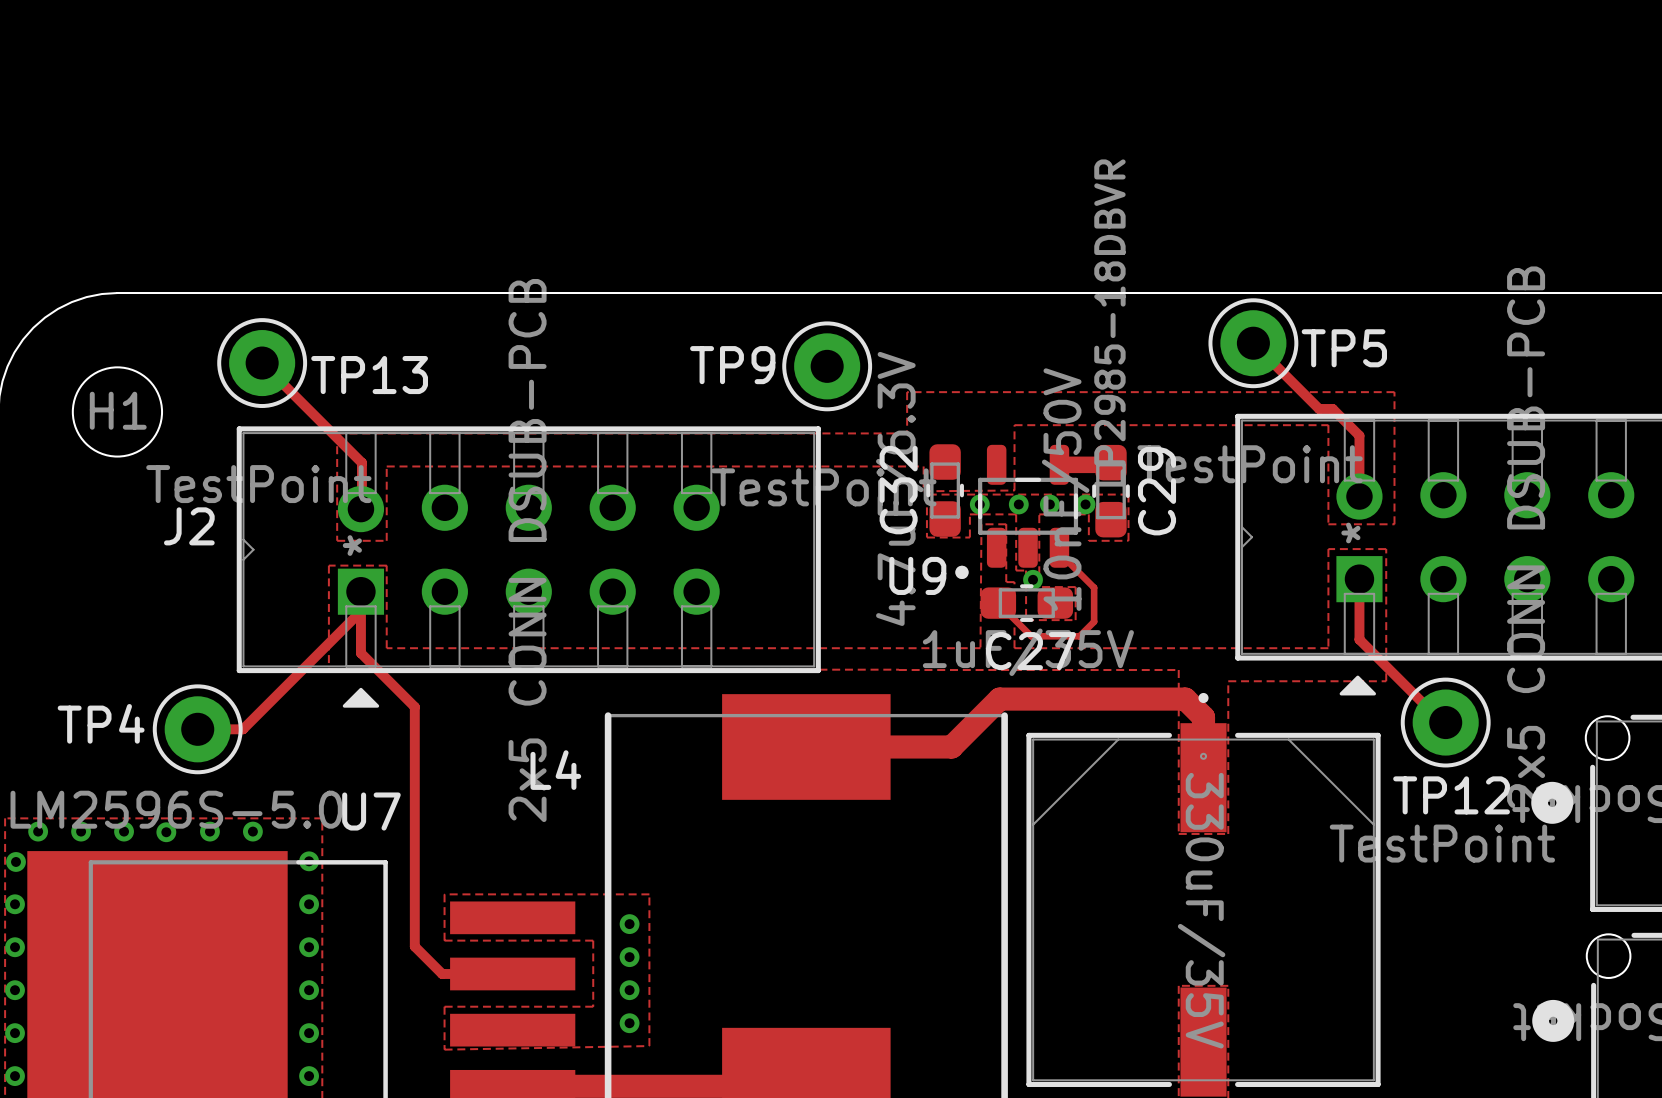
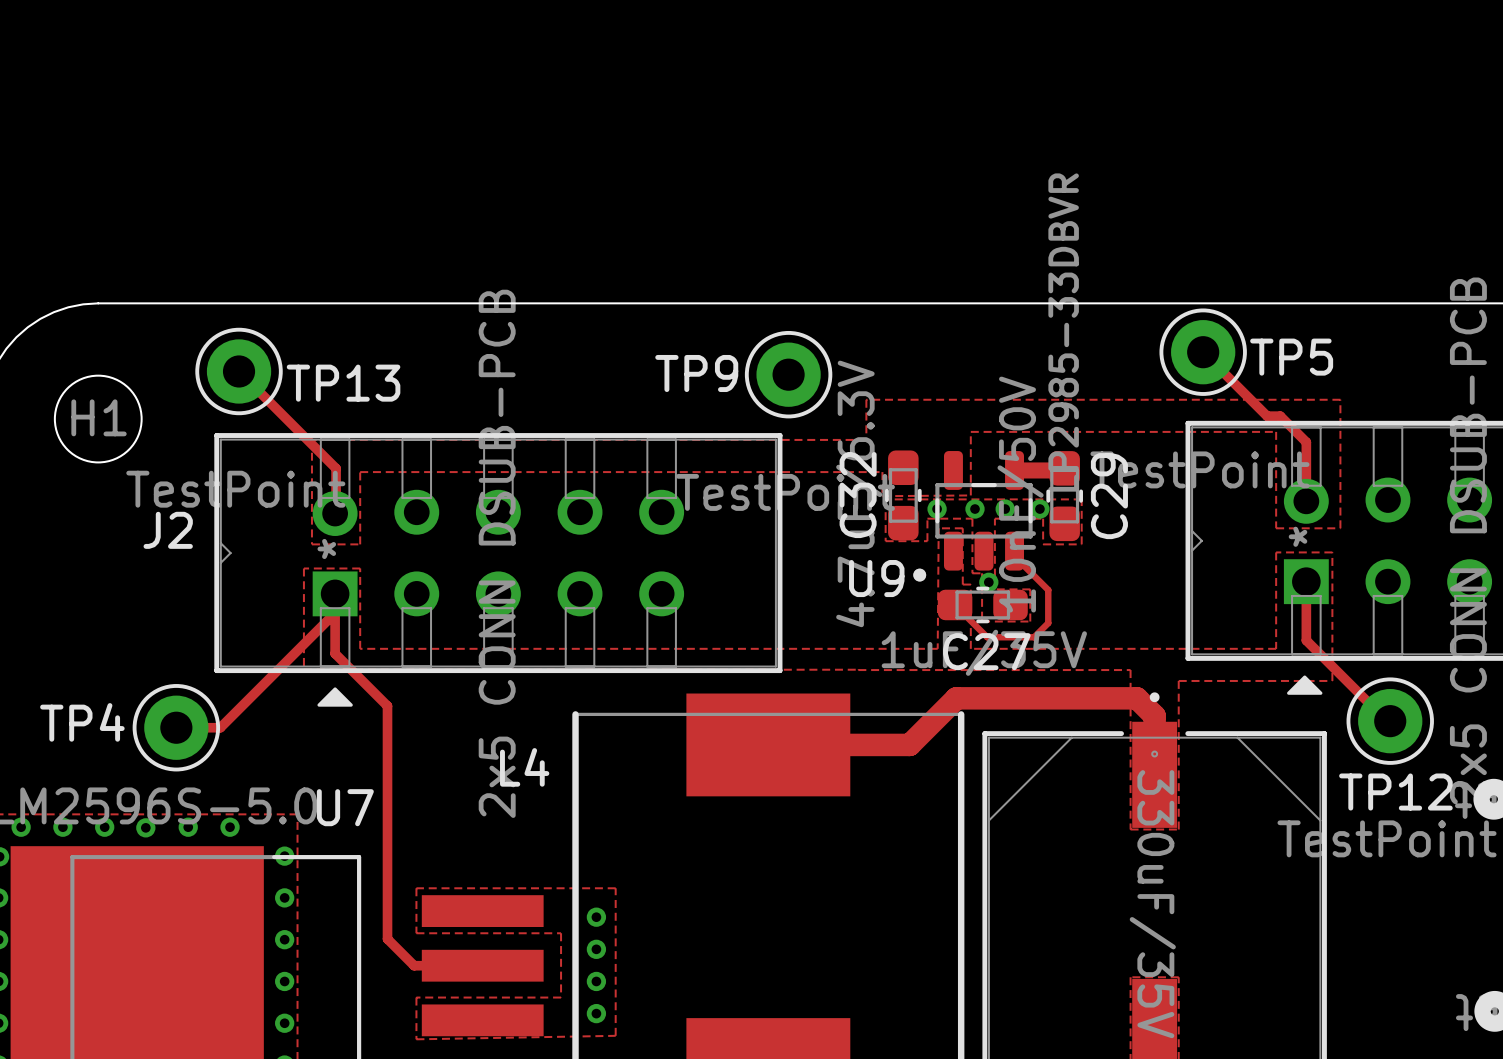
U9 value: LP2985-18DBVR (1109, 323) -> LP2985-33DBVR (1063, 332)

